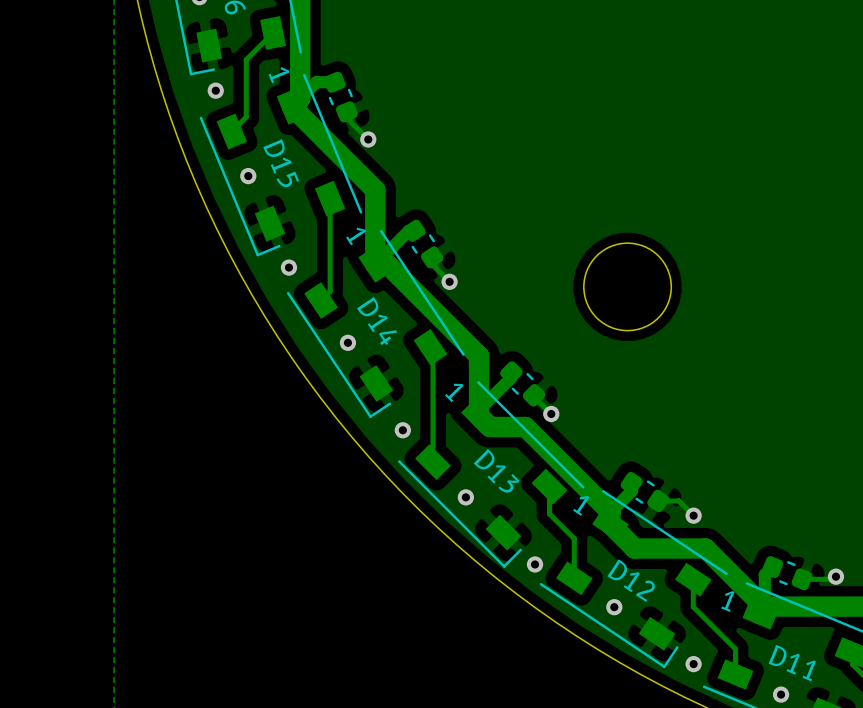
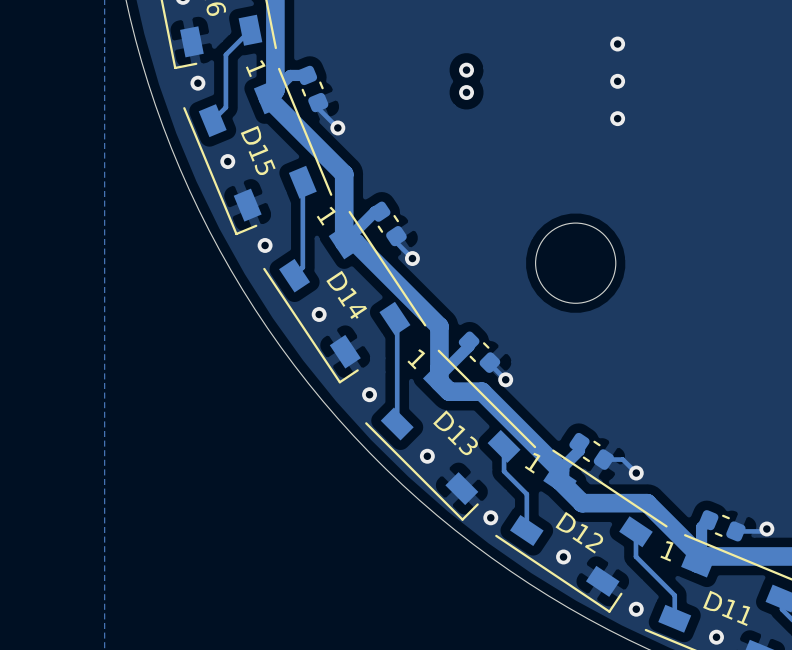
via: none -> (617, 44)
via: none -> (466, 70)
via: none -> (617, 81)
via: none -> (466, 92)
via: none -> (617, 118)

